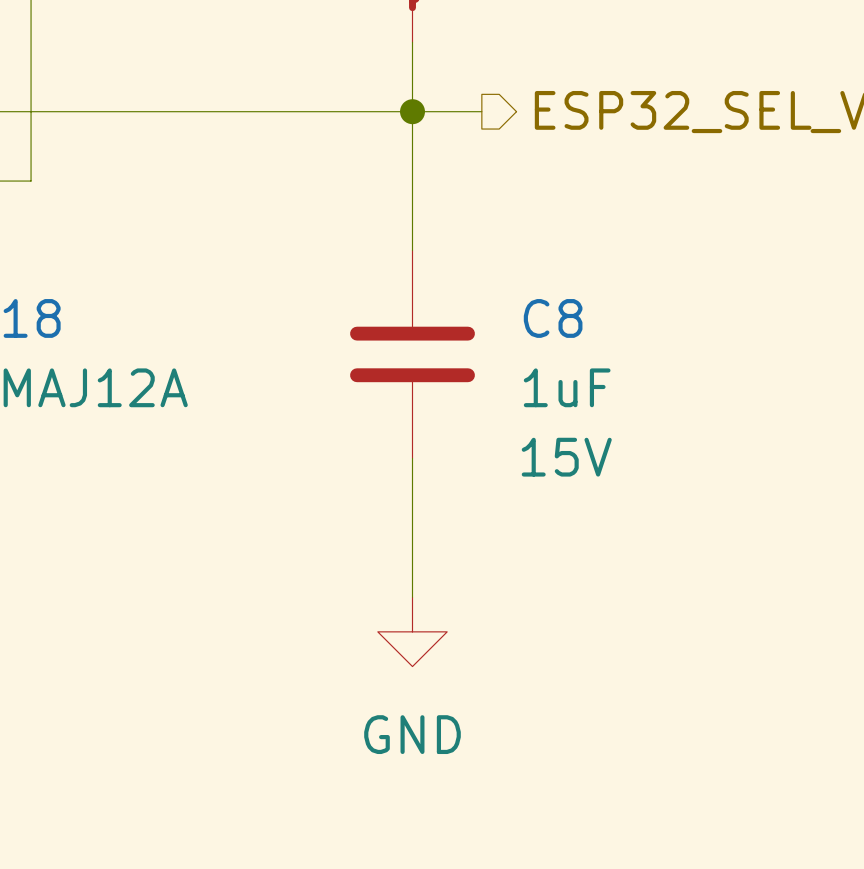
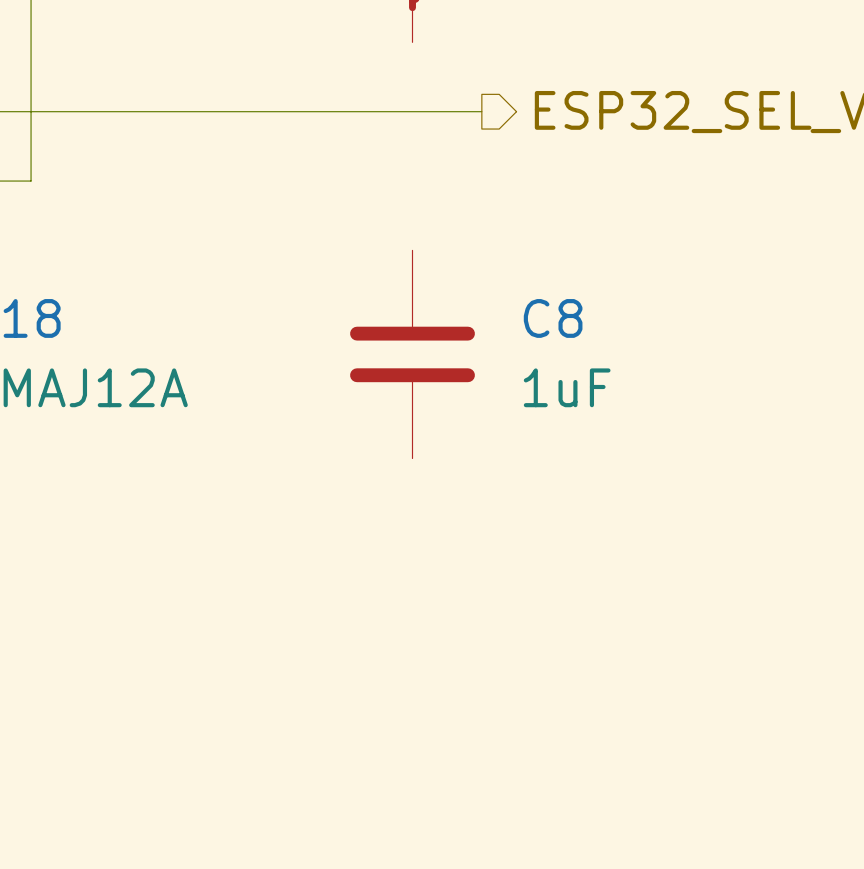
wire: (412, 42) (412, 250) -> none
junction: (412, 111) -> none
C8 text: 15V (566, 457) -> none
wire: (412, 458) (412, 597) -> none
power symbol: GND (412, 631) -> none

